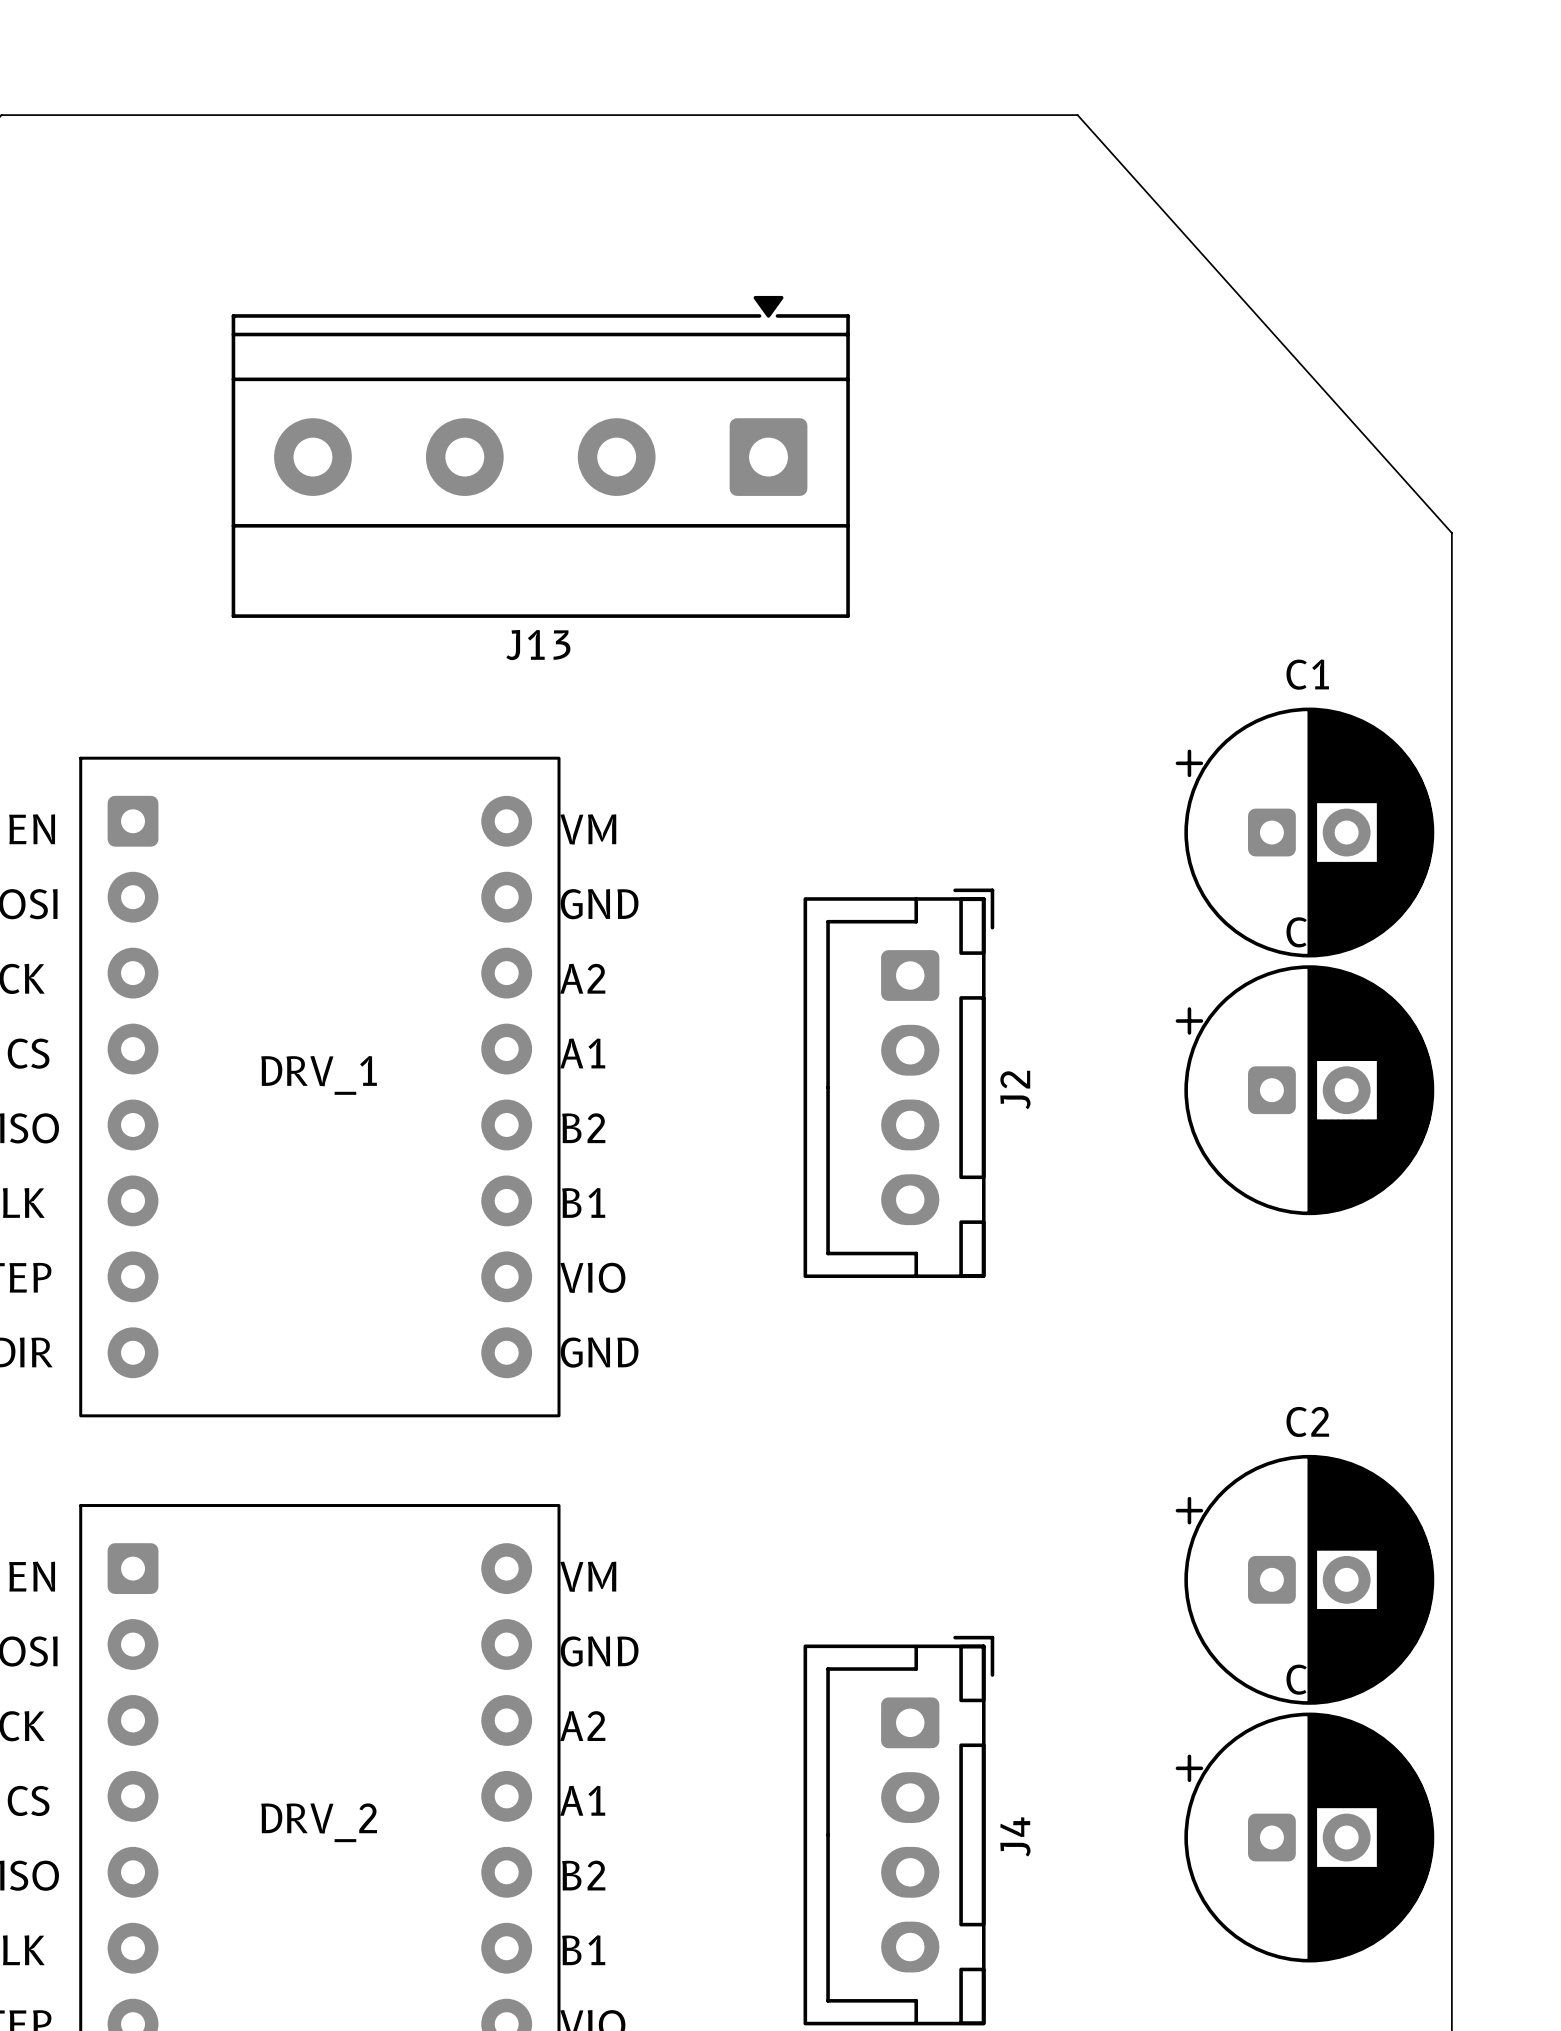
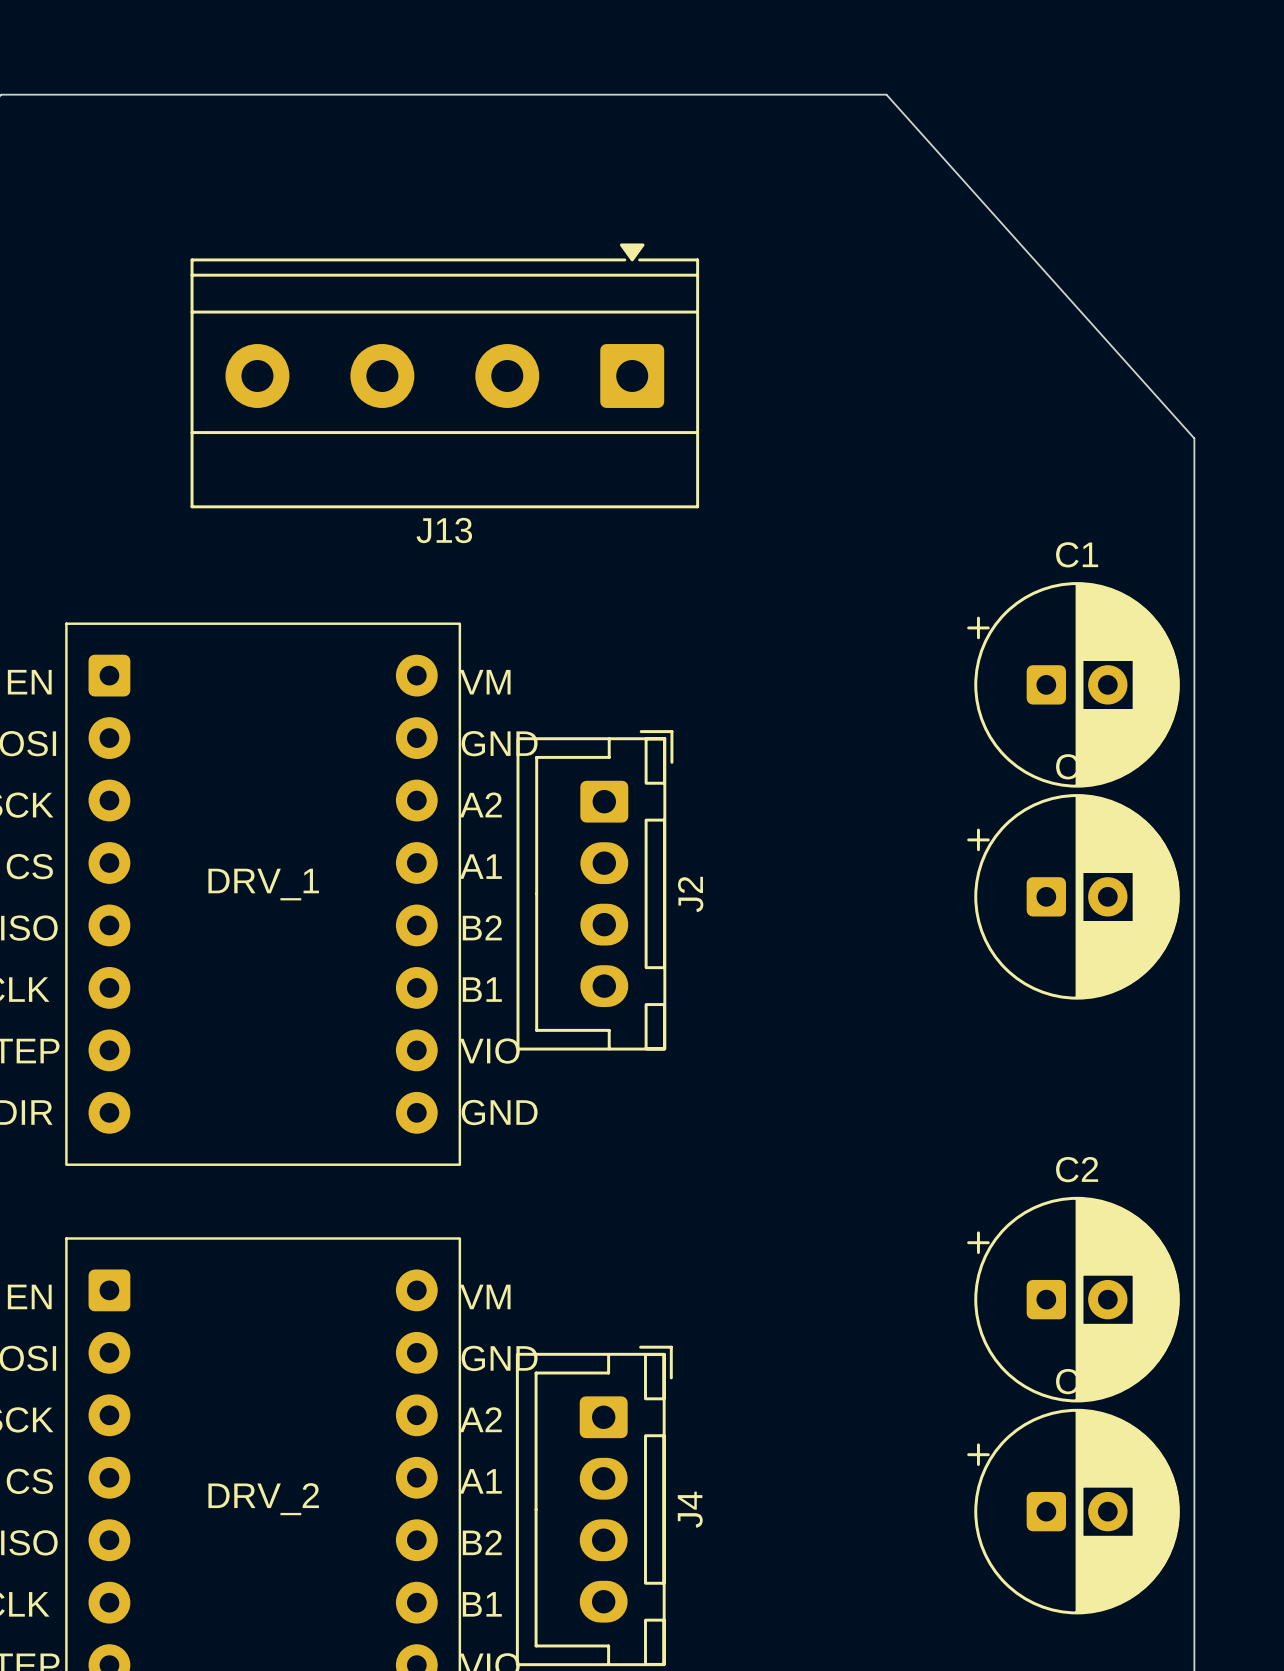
J2 position: (898, 1083) -> (594, 890)
J4 position: (898, 1830) -> (594, 1505)

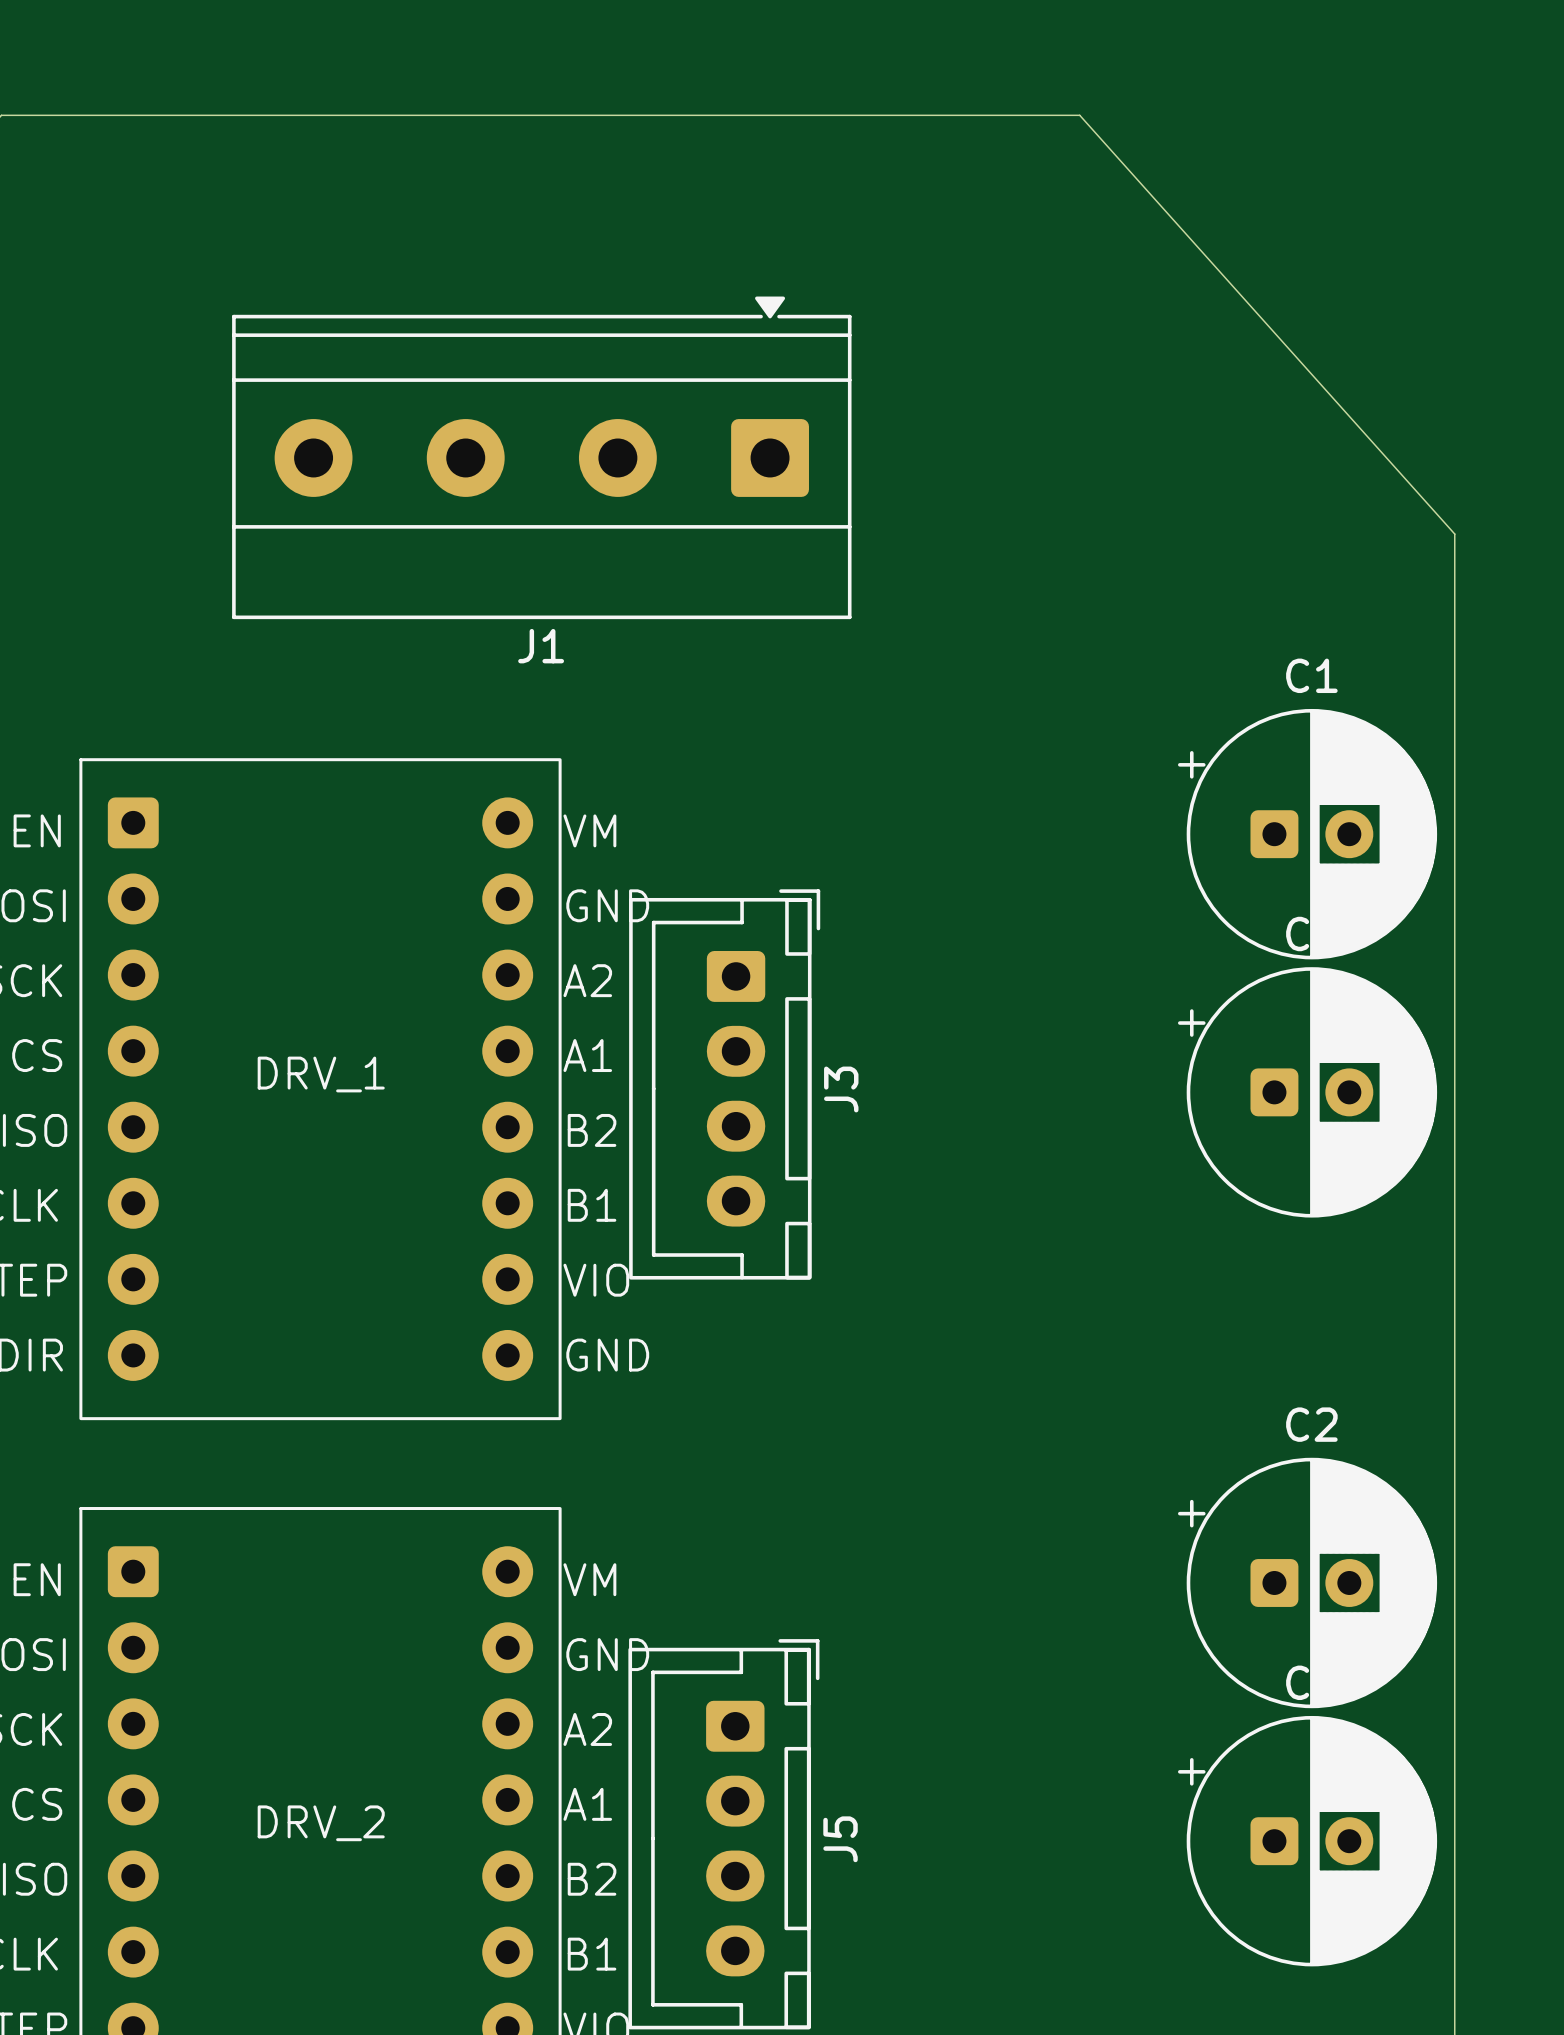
J13 name: J13 (444, 530) -> J1 (541, 646)
J2 name: J2 (690, 894) -> J3 (841, 1089)
J4 name: J4 (690, 1509) -> J5 (840, 1839)

